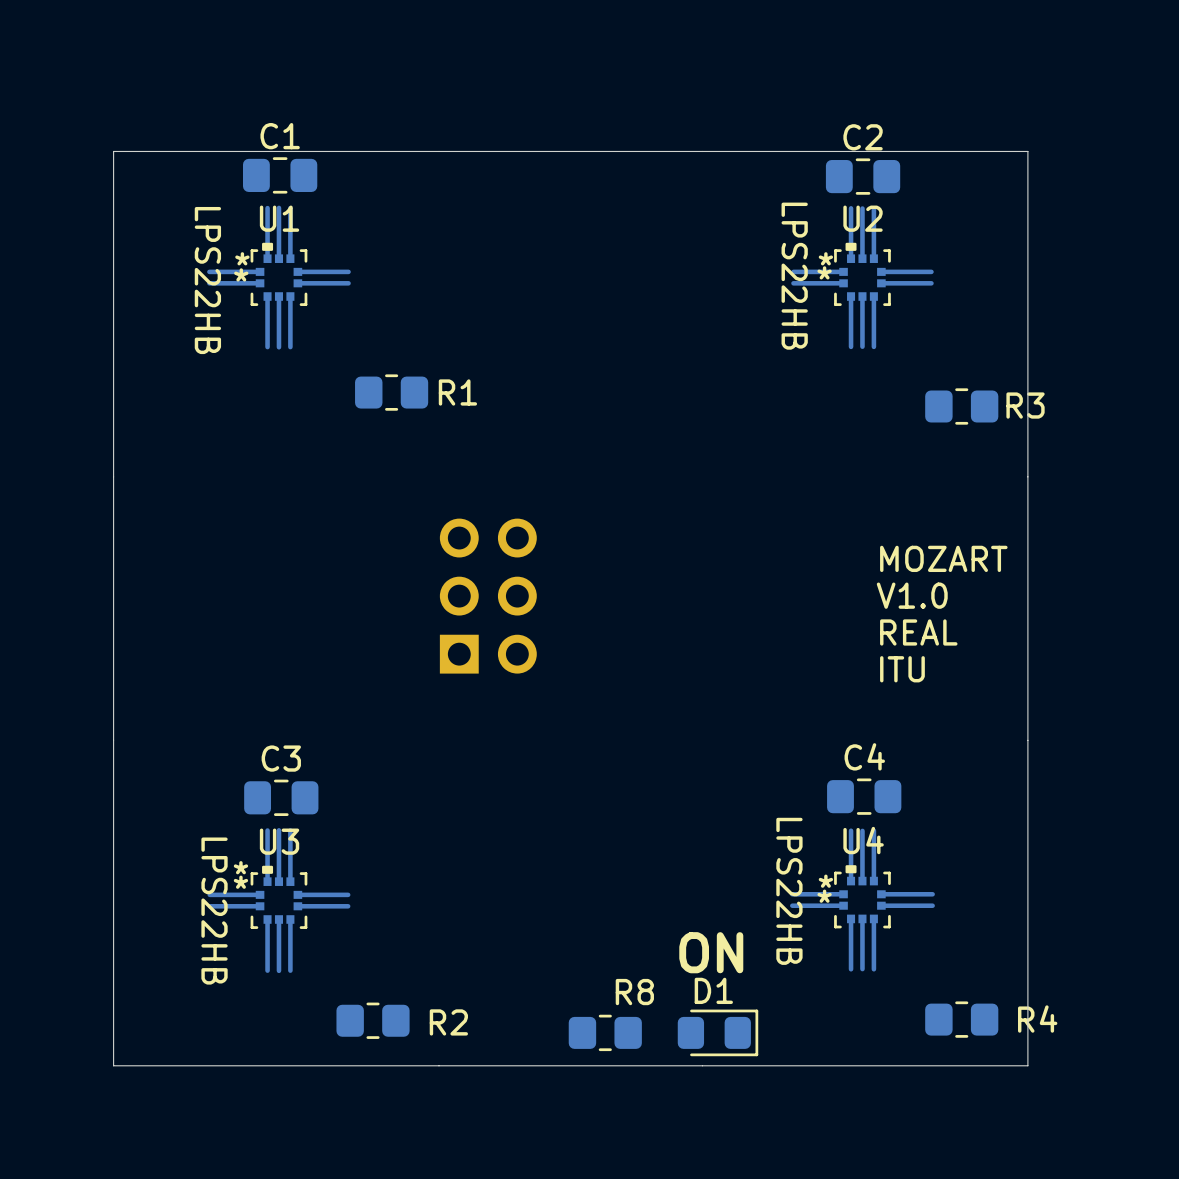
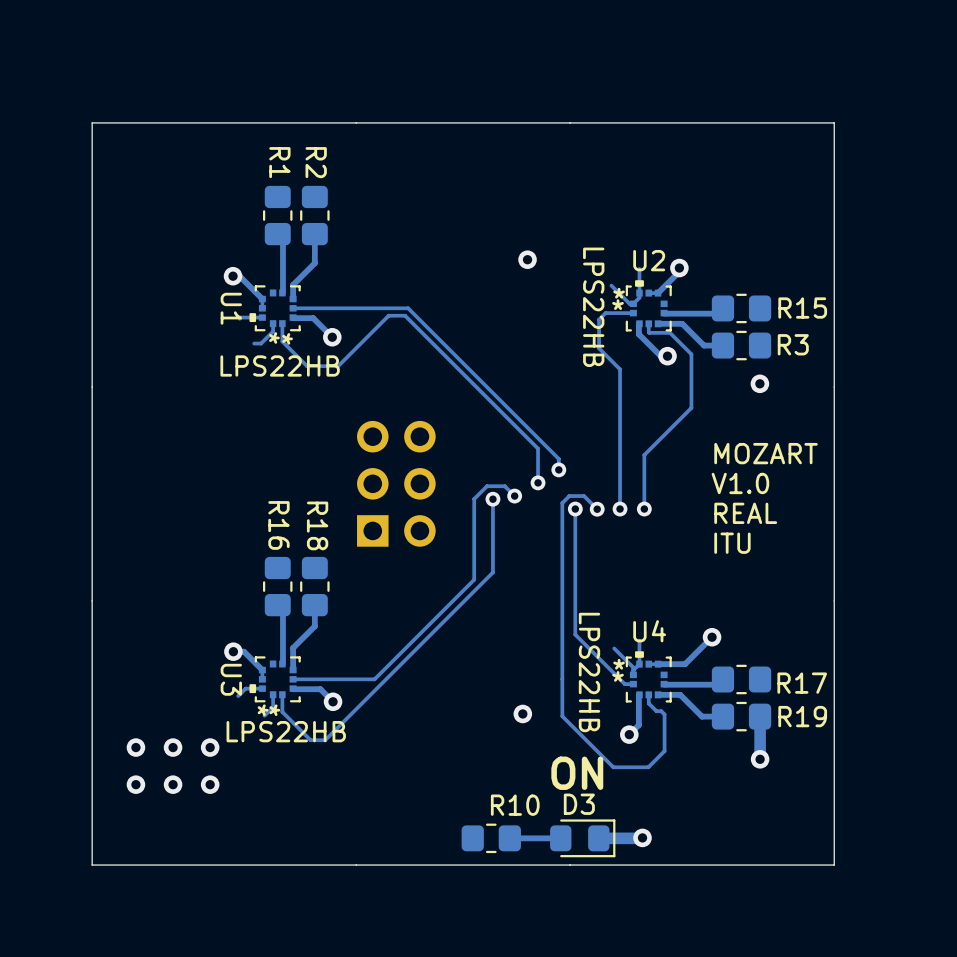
C1: (280, 175) -> none
C2: (863, 176) -> none
track: (278, 207) (278, 258) -> none
track: (267, 208) (267, 258) -> none
track: (290, 208) (290, 258) -> none
track: (851, 208) (851, 258) -> none
track: (862, 208) (862, 258) -> none
track: (873, 208) (873, 258) -> none
track: (260, 271) (209, 271) -> none
track: (348, 271) (297, 271) -> none
track: (843, 271) (793, 271) -> none
track: (931, 271) (881, 271) -> none
U1 rotation: 0° (278, 274) -> 90° counterclockwise (275, 308)
U1 position: (278, 274) -> (275, 308)
U2 position: (862, 274) -> (648, 305)
track: (260, 283) (209, 283) -> none
track: (348, 283) (297, 283) -> none
track: (843, 283) (793, 283) -> none
track: (931, 283) (881, 283) -> none
track: none -> (277, 234) (282, 239) (282, 292)
track: none -> (314, 234) (314, 263) (293, 284) (293, 298)
track: (267, 296) (267, 347) -> none
track: (278, 296) (278, 347) -> none
track: (290, 296) (290, 347) -> none
track: (851, 296) (851, 346) -> none
track: (862, 296) (862, 346) -> none
track: (873, 296) (873, 346) -> none
via: none -> (527, 259)
track: none -> (679, 268) (679, 271) (658, 293) (648, 293)
via: none -> (679, 268)
track: none -> (639, 268) (639, 297) (633, 303) (629, 303) (611, 285)
track: none -> (233, 276) (239, 276) (262, 299) (262, 308)
via: none -> (233, 276)
track: none -> (293, 308) (408, 308) (558, 458) (558, 469)
track: none -> (722, 308) (717, 313) (664, 313)
R15: none -> (741, 308)
track: none -> (633, 313) (605, 313) (599, 319) (599, 348) (620, 369) (620, 509)
track: none -> (262, 317) (239, 318)
track: none -> (293, 318) (313, 318) (332, 337)
R1 rotation: 0° (391, 392) -> 90° clockwise (277, 215)
R1 position: (391, 392) -> (277, 215)
R1 name position: R1 (457, 392) -> R1 (279, 162)
track: none -> (273, 323) (273, 331) (261, 343) (254, 343)
track: none -> (282, 323) (282, 341) (307, 366) (338, 366) (388, 315) (405, 315) (538, 448) (538, 482)
track: none -> (638, 323) (638, 334) (660, 356) (667, 356)
track: none -> (648, 323) (649, 332) (670, 332) (691, 354) (691, 407) (644, 455) (644, 509)
track: none -> (658, 323) (682, 323) (704, 345) (722, 345)
R3 position: (961, 406) -> (741, 345)
via: none -> (332, 337)
via: none -> (667, 356)
via: none -> (759, 383)
via: none -> (558, 469)
via: none -> (538, 482)
track: none -> (514, 496) (504, 486) (487, 486) (474, 499) (474, 579) (374, 679) (293, 679)
via: none -> (514, 496)
track: none -> (492, 499) (492, 572) (325, 740) (310, 740) (282, 712) (282, 694)
via: none -> (492, 499)
track: none -> (575, 509) (575, 634) (624, 684) (633, 684)
via: none -> (575, 509)
track: none -> (597, 509) (584, 496) (569, 496) (562, 503) (562, 716) (613, 767) (648, 767) (664, 751) (664, 714) (661, 711) (656, 711) (648, 703) (648, 694)
via: none -> (597, 509)
via: none -> (620, 509)
via: none -> (644, 509)
R16: none -> (277, 586)
R18: none -> (314, 586)
track: none -> (277, 605) (282, 610) (282, 663)
track: none -> (314, 605) (314, 626) (293, 648) (293, 669)
track: none -> (712, 637) (685, 664) (648, 664)
via: none -> (712, 637)
track: none -> (639, 640) (639, 664) (633, 670)
C4: (864, 796) -> none
C3: (281, 797) -> none
track: none -> (614, 648) (633, 667) (633, 674)
track: none -> (233, 651) (244, 651) (262, 670) (262, 679)
via: none -> (233, 651)
track: (267, 830) (267, 881) -> none
track: (278, 830) (278, 881) -> none
track: (290, 830) (290, 881) -> none
track: (851, 830) (851, 881) -> none
track: (862, 830) (862, 881) -> none
track: (873, 830) (873, 881) -> none
track: none -> (722, 679) (717, 684) (664, 684)
R17: none -> (741, 679)
track: none -> (262, 688) (245, 688) (238, 696)
track: none -> (293, 689) (320, 689) (333, 701)
track: none -> (273, 694) (273, 707) (264, 715)
track: none -> (638, 694) (638, 725) (629, 734)
track: none -> (658, 694) (680, 694) (702, 716) (722, 716)
via: none -> (333, 701)
via: none -> (522, 713)
R19: none -> (741, 716)
track: none -> (760, 716) (760, 759)
track: (260, 894) (209, 894) -> none
track: (348, 894) (297, 894) -> none
track: (843, 894) (792, 894) -> none
track: (932, 894) (881, 894) -> none
U4 position: (862, 896) -> (648, 676)
U3 rotation: 0° (278, 897) -> 90° counterclockwise (275, 679)
U3 position: (278, 897) -> (275, 679)
via: none -> (629, 734)
track: (843, 905) (792, 905) -> none
track: (932, 905) (881, 905) -> none
track: (260, 906) (209, 906) -> none
track: (348, 906) (297, 906) -> none
track: (851, 918) (851, 969) -> none
track: (862, 918) (862, 969) -> none
track: (873, 918) (873, 969) -> none
track: (267, 919) (267, 970) -> none
track: (278, 919) (278, 970) -> none
track: (290, 919) (290, 970) -> none
via: none -> (135, 747)
via: none -> (173, 747)
via: none -> (210, 747)
via: none -> (760, 759)
via: none -> (135, 784)
via: none -> (173, 784)
via: none -> (210, 784)
D1 name: D1 (713, 990) -> D3 (579, 804)
R8 name: R8 (634, 992) -> R10 (515, 805)
R4: (961, 1019) -> none
R2 rotation: 0° (373, 1020) -> 90° clockwise (314, 215)
R2 position: (373, 1020) -> (314, 215)
R2 name position: R2 (448, 1022) -> R2 (316, 162)
track: none -> (560, 838) (509, 838)
track: none -> (642, 837) (598, 838)
via: none -> (642, 837)

